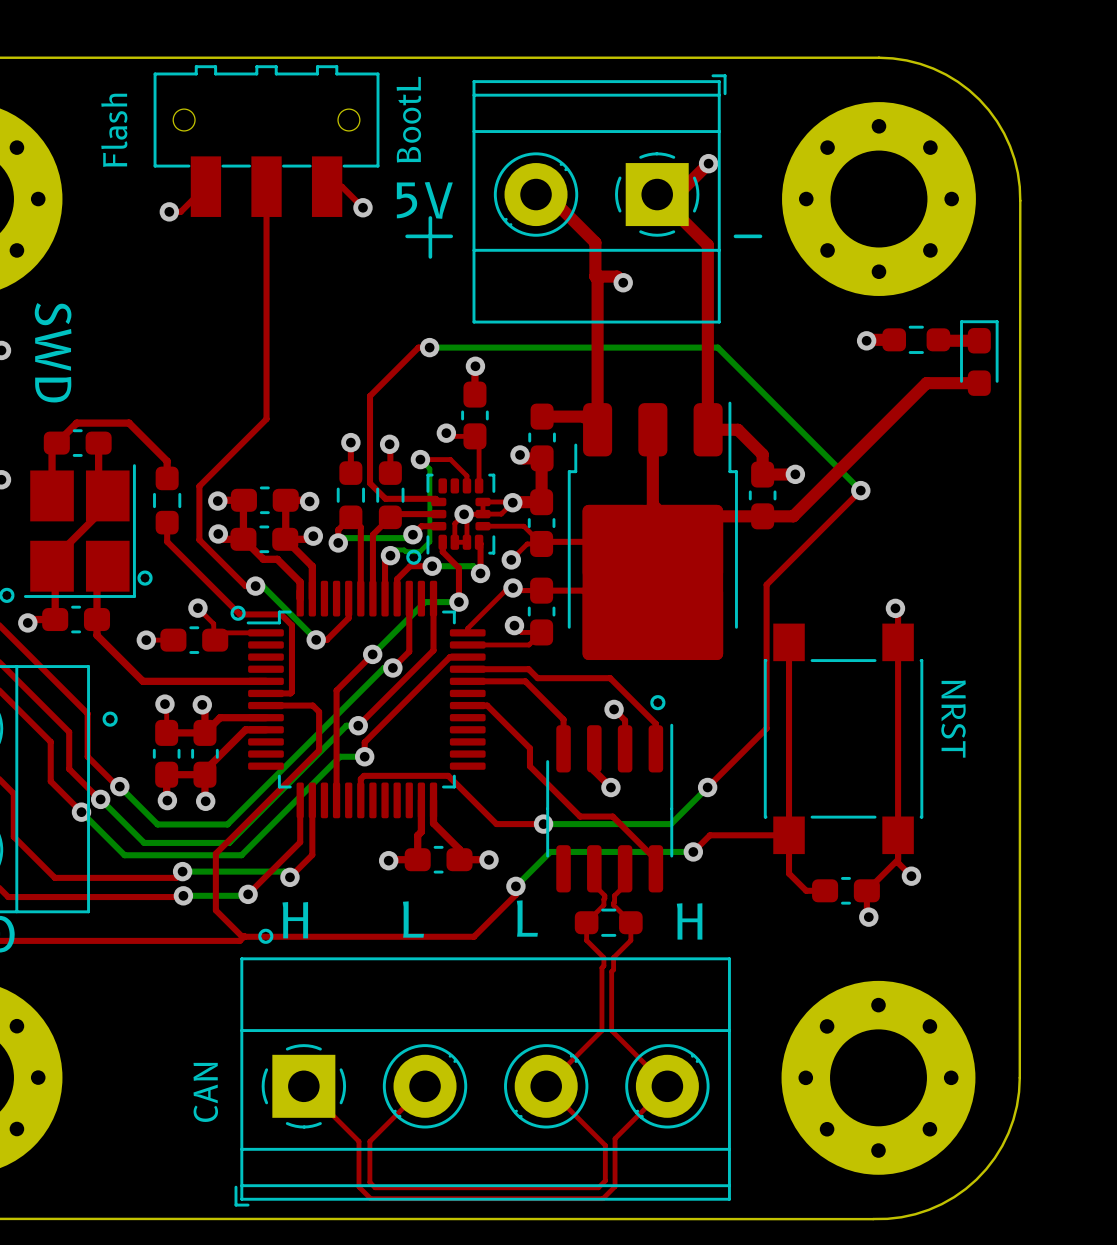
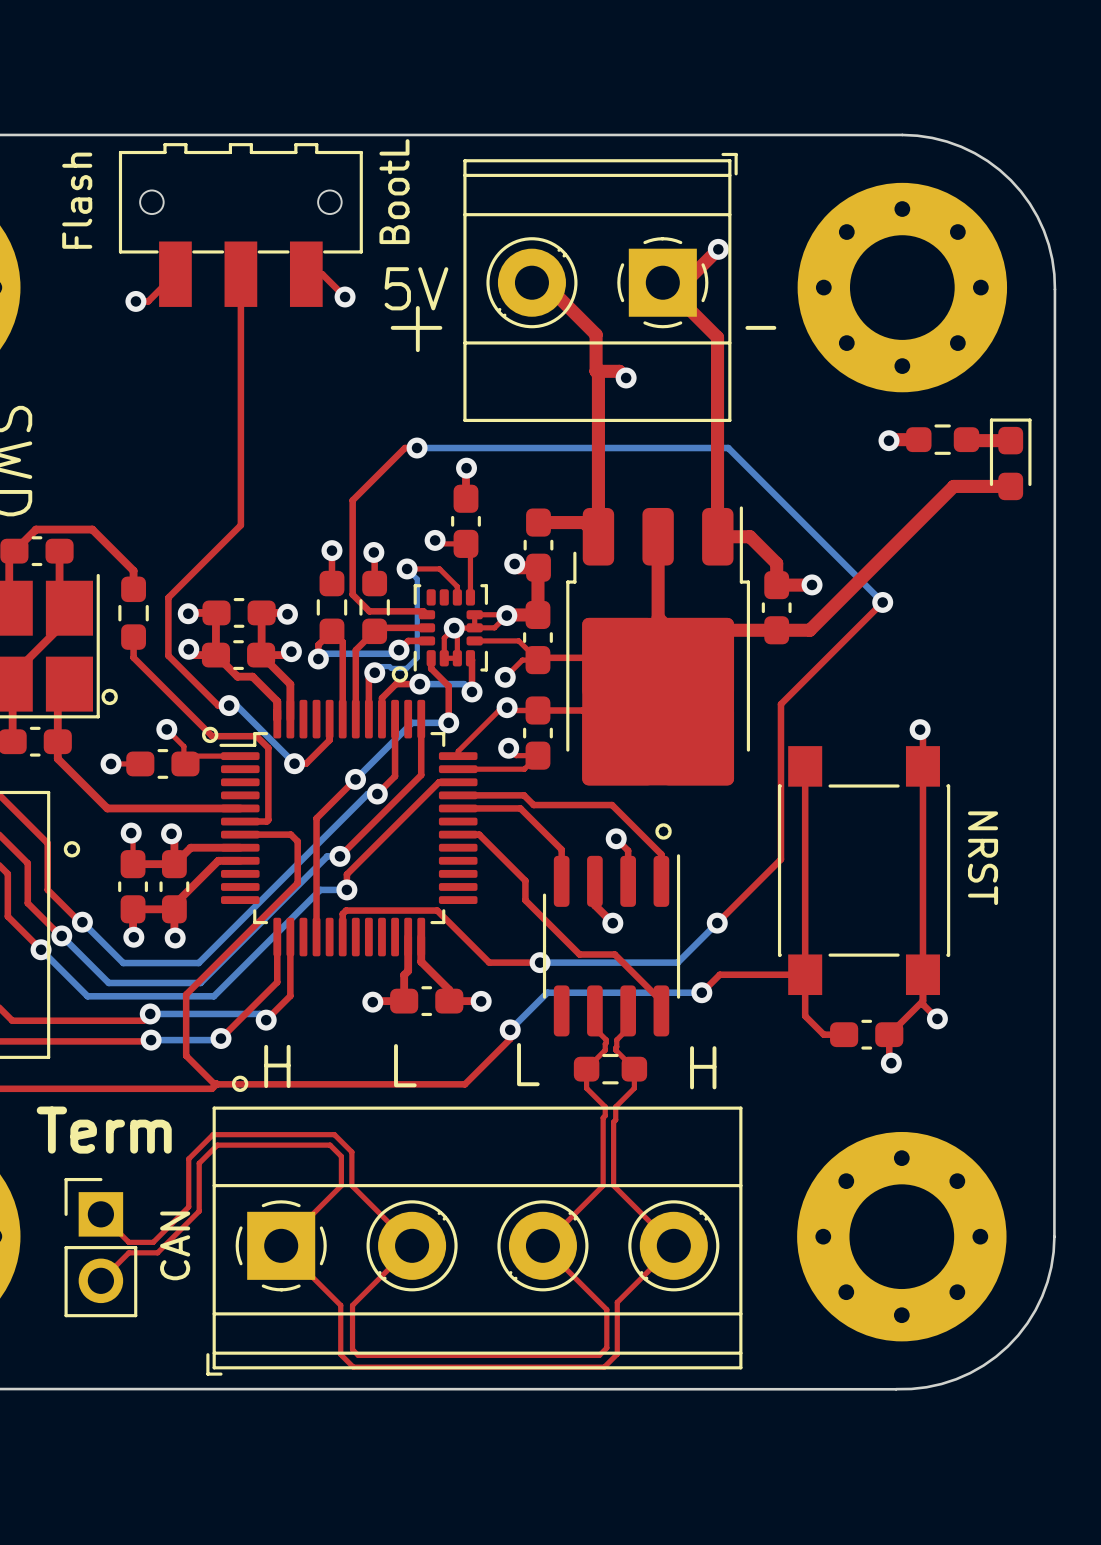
text: none -> Term (104, 1130)
top track: none -> (100, 1214) (128, 1242) (153, 1242) (188, 1206) (188, 1158) (213, 1134) (334, 1134) (351, 1152) (351, 1185) (412, 1245)
top track: none -> (281, 1245) (341, 1185) (341, 1156) (330, 1145) (217, 1145) (199, 1163) (199, 1211) (157, 1252) (128, 1252) (100, 1280)
part: none -> (100, 1247)

